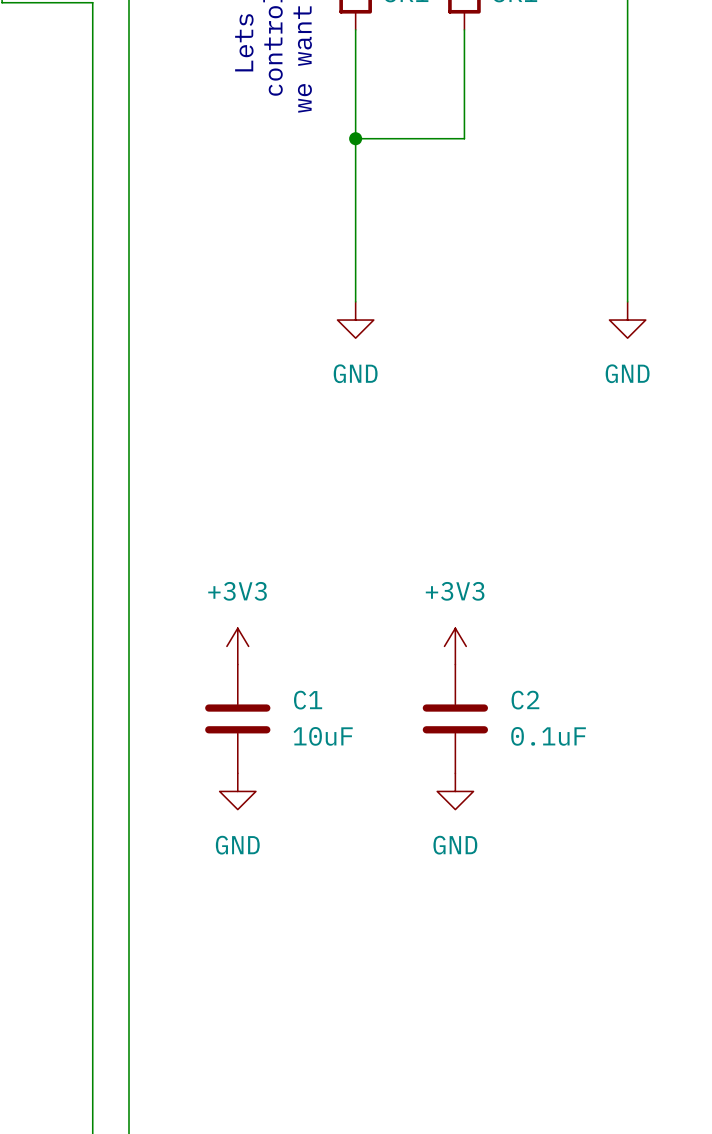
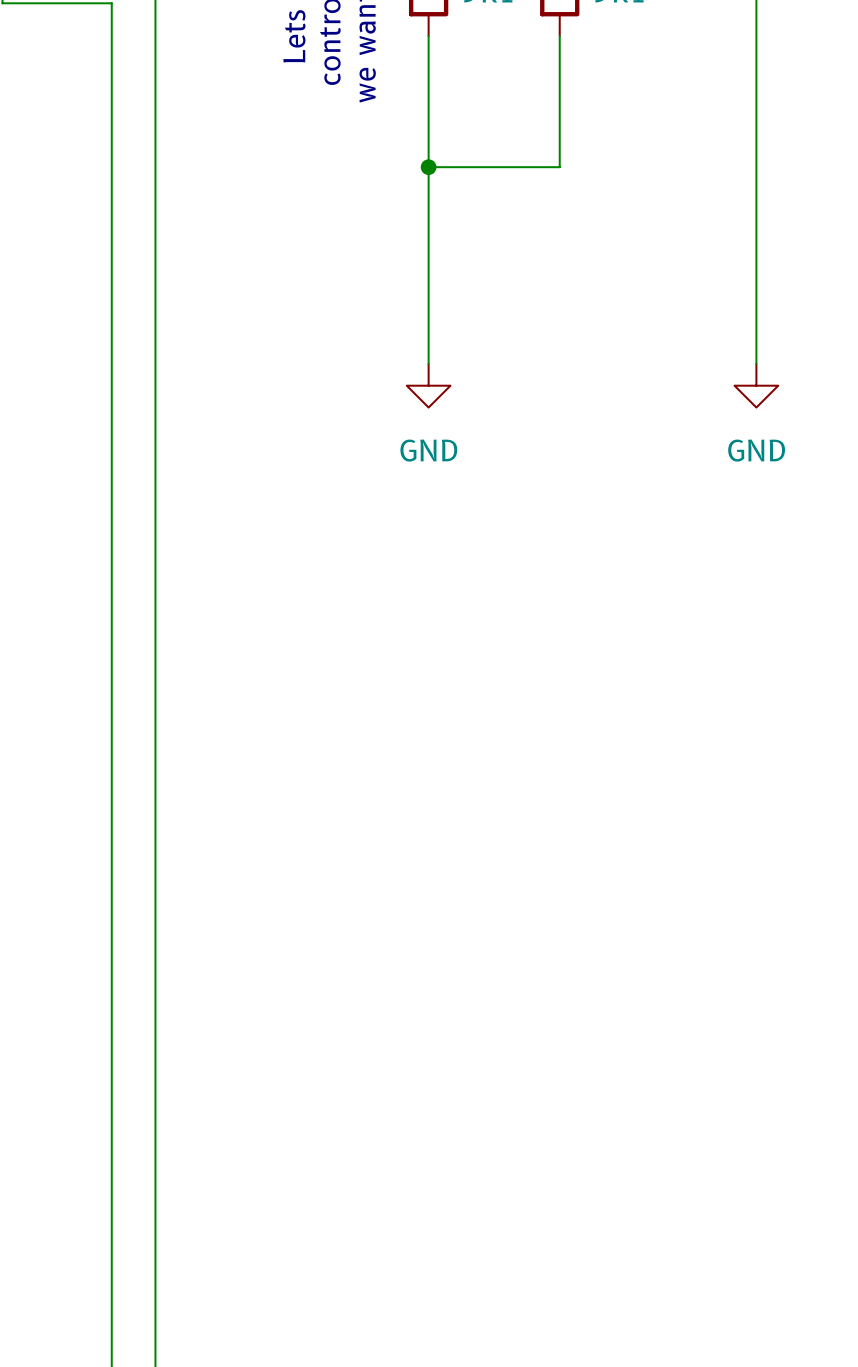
power symbol: +3V3 (237, 646) -> none
power symbol: +3V3 (455, 646) -> none
C1: 10uF (237, 718) -> none
C2: 0.1uF (455, 718) -> none
power symbol: GND (237, 791) -> none
power symbol: GND (455, 791) -> none

